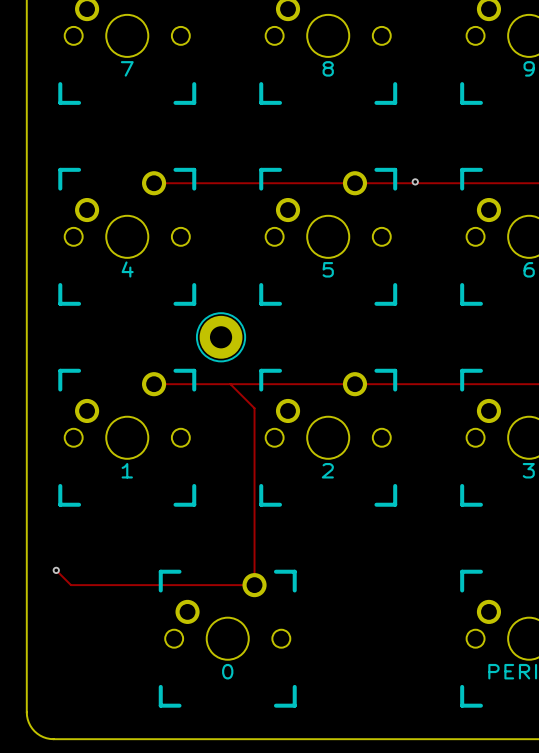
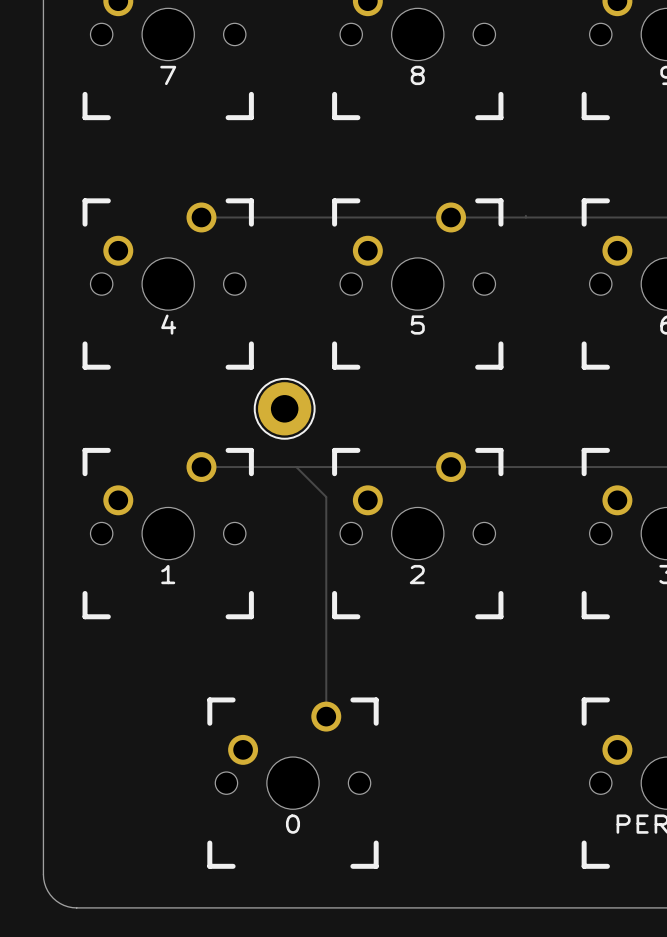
via: (415, 181) -> none
track: (56, 570) (71, 585) (254, 585) -> none
via: (56, 570) -> none

